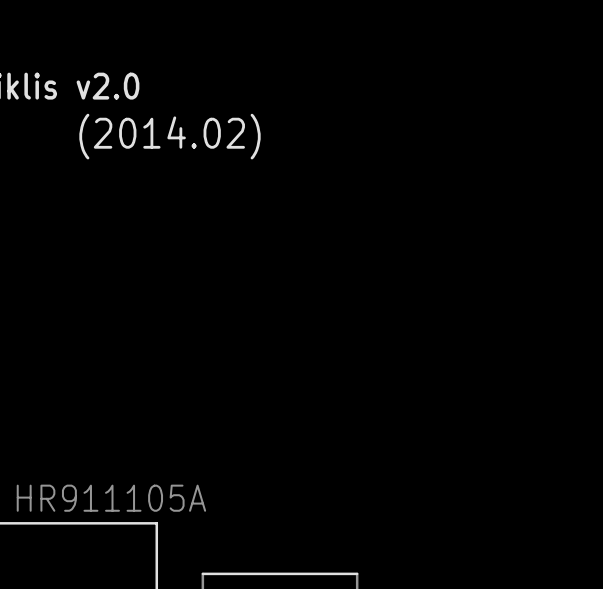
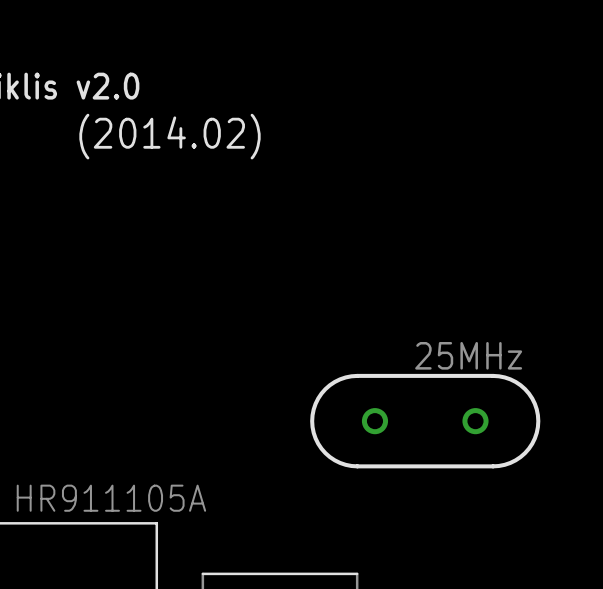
part: none -> 25MHz (425, 421)

